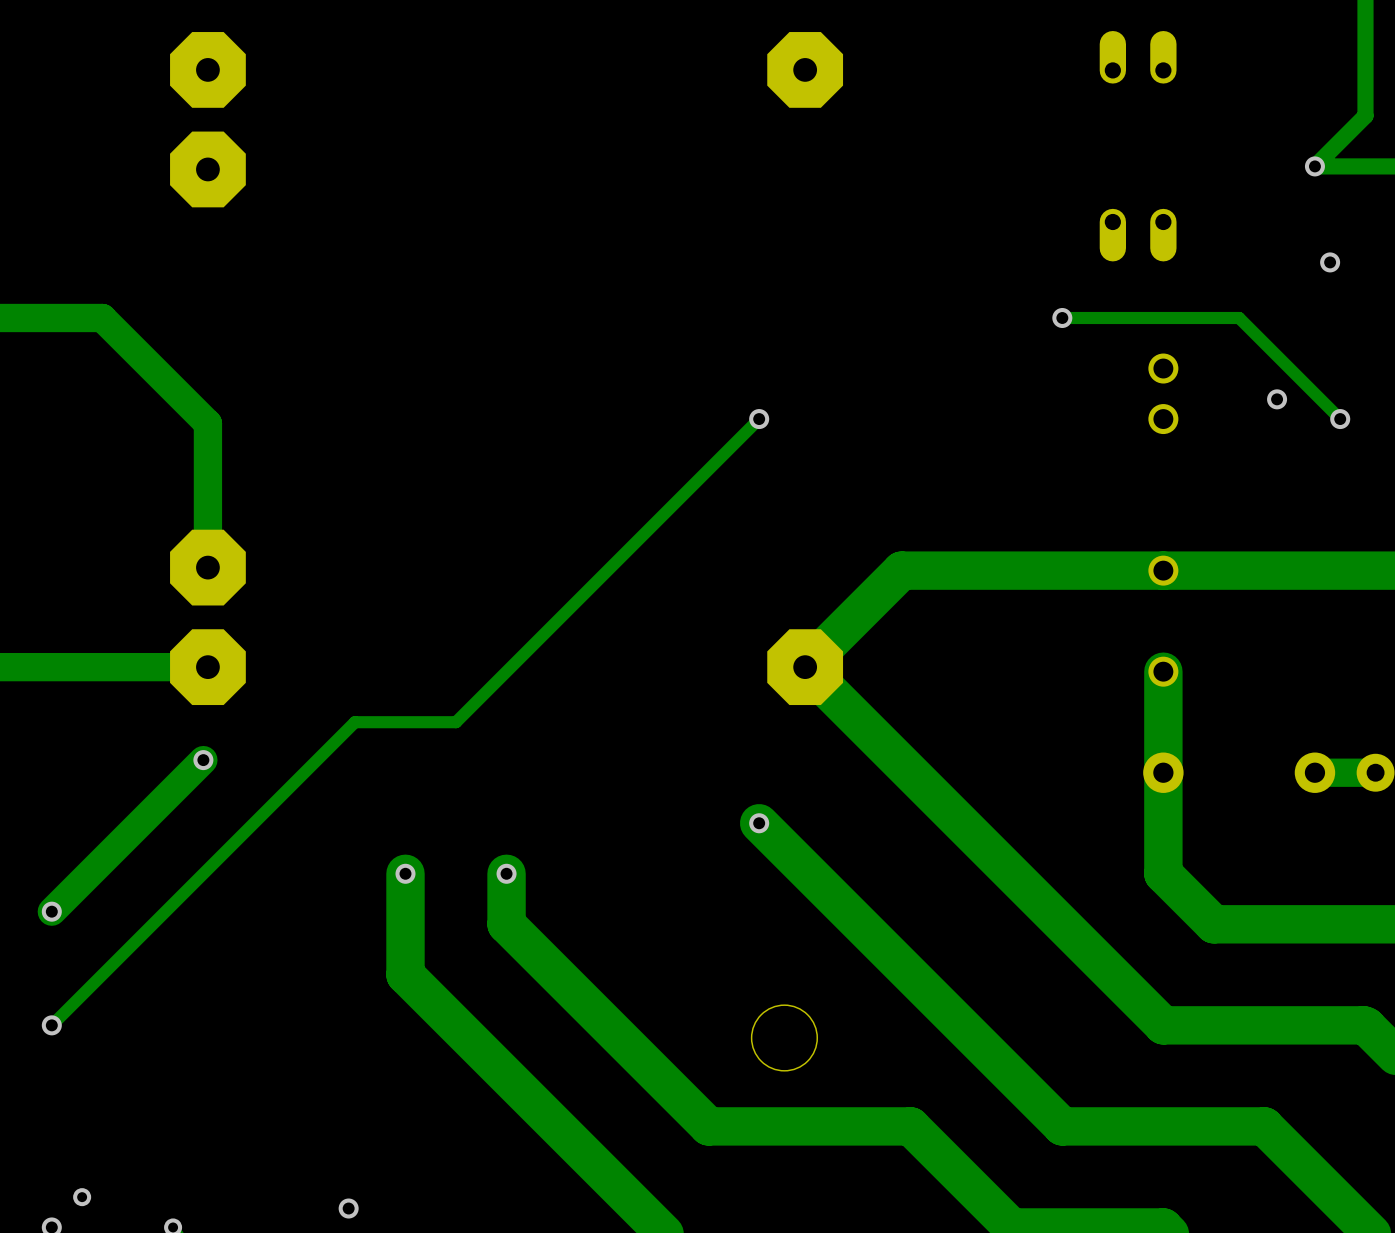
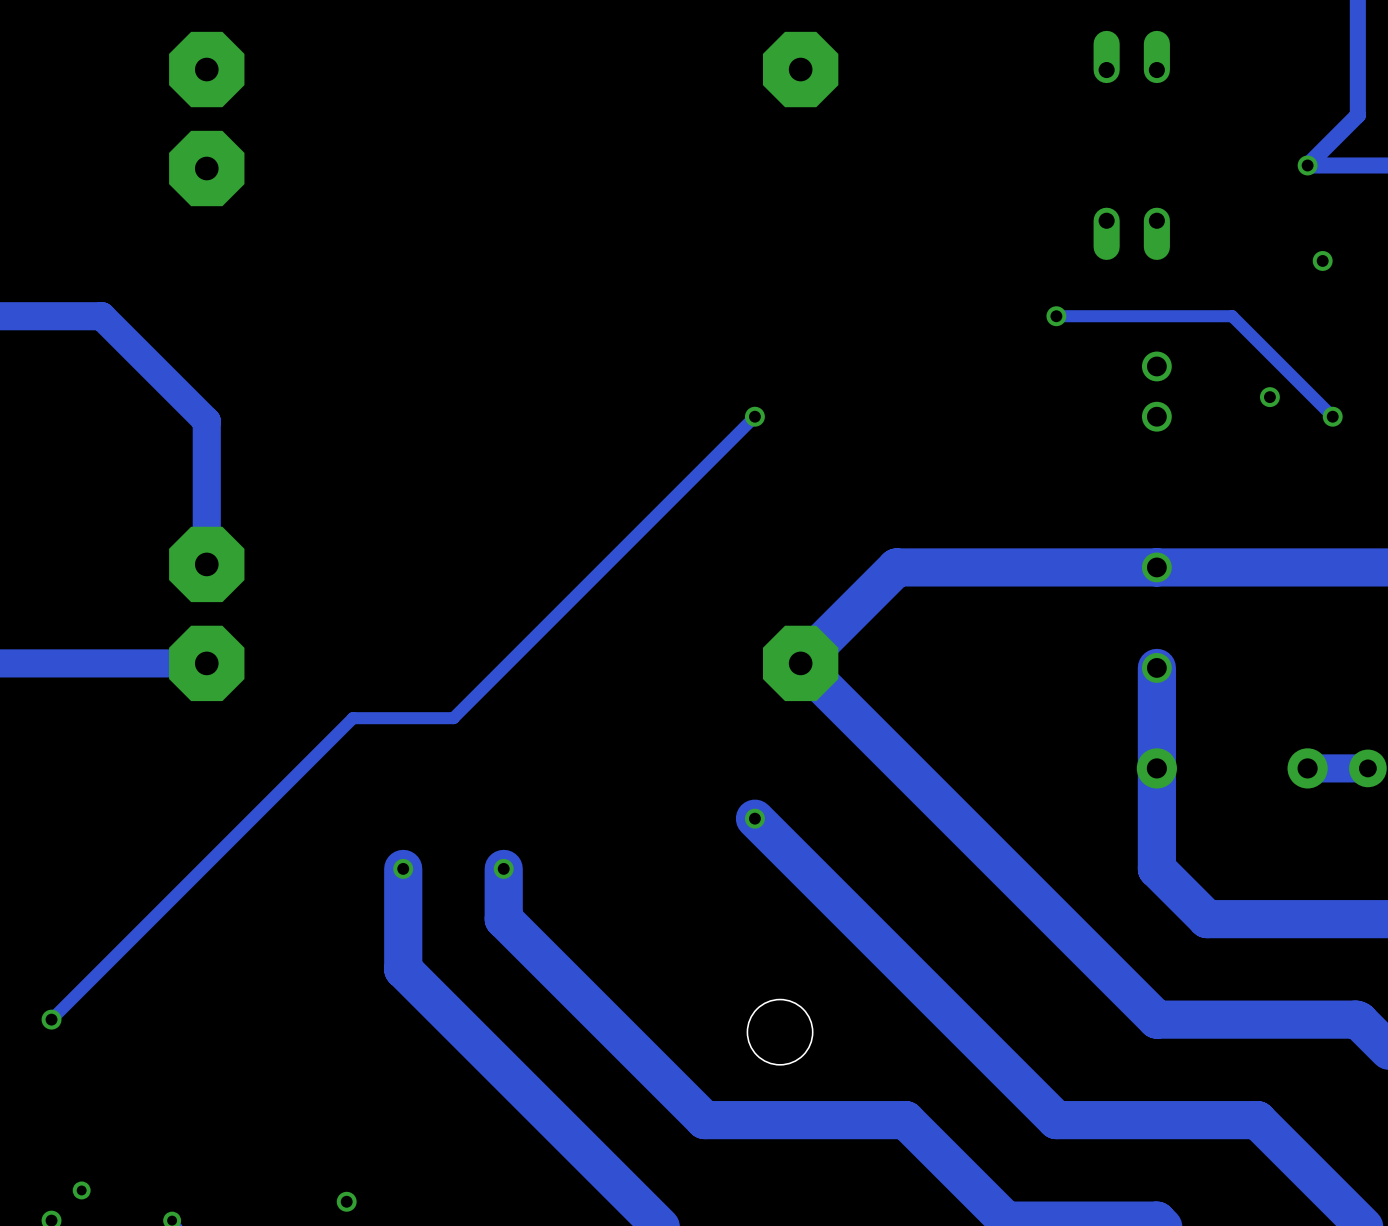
track: (203, 760) (51, 911) -> none
via: (203, 760) -> none
via: (51, 911) -> none

